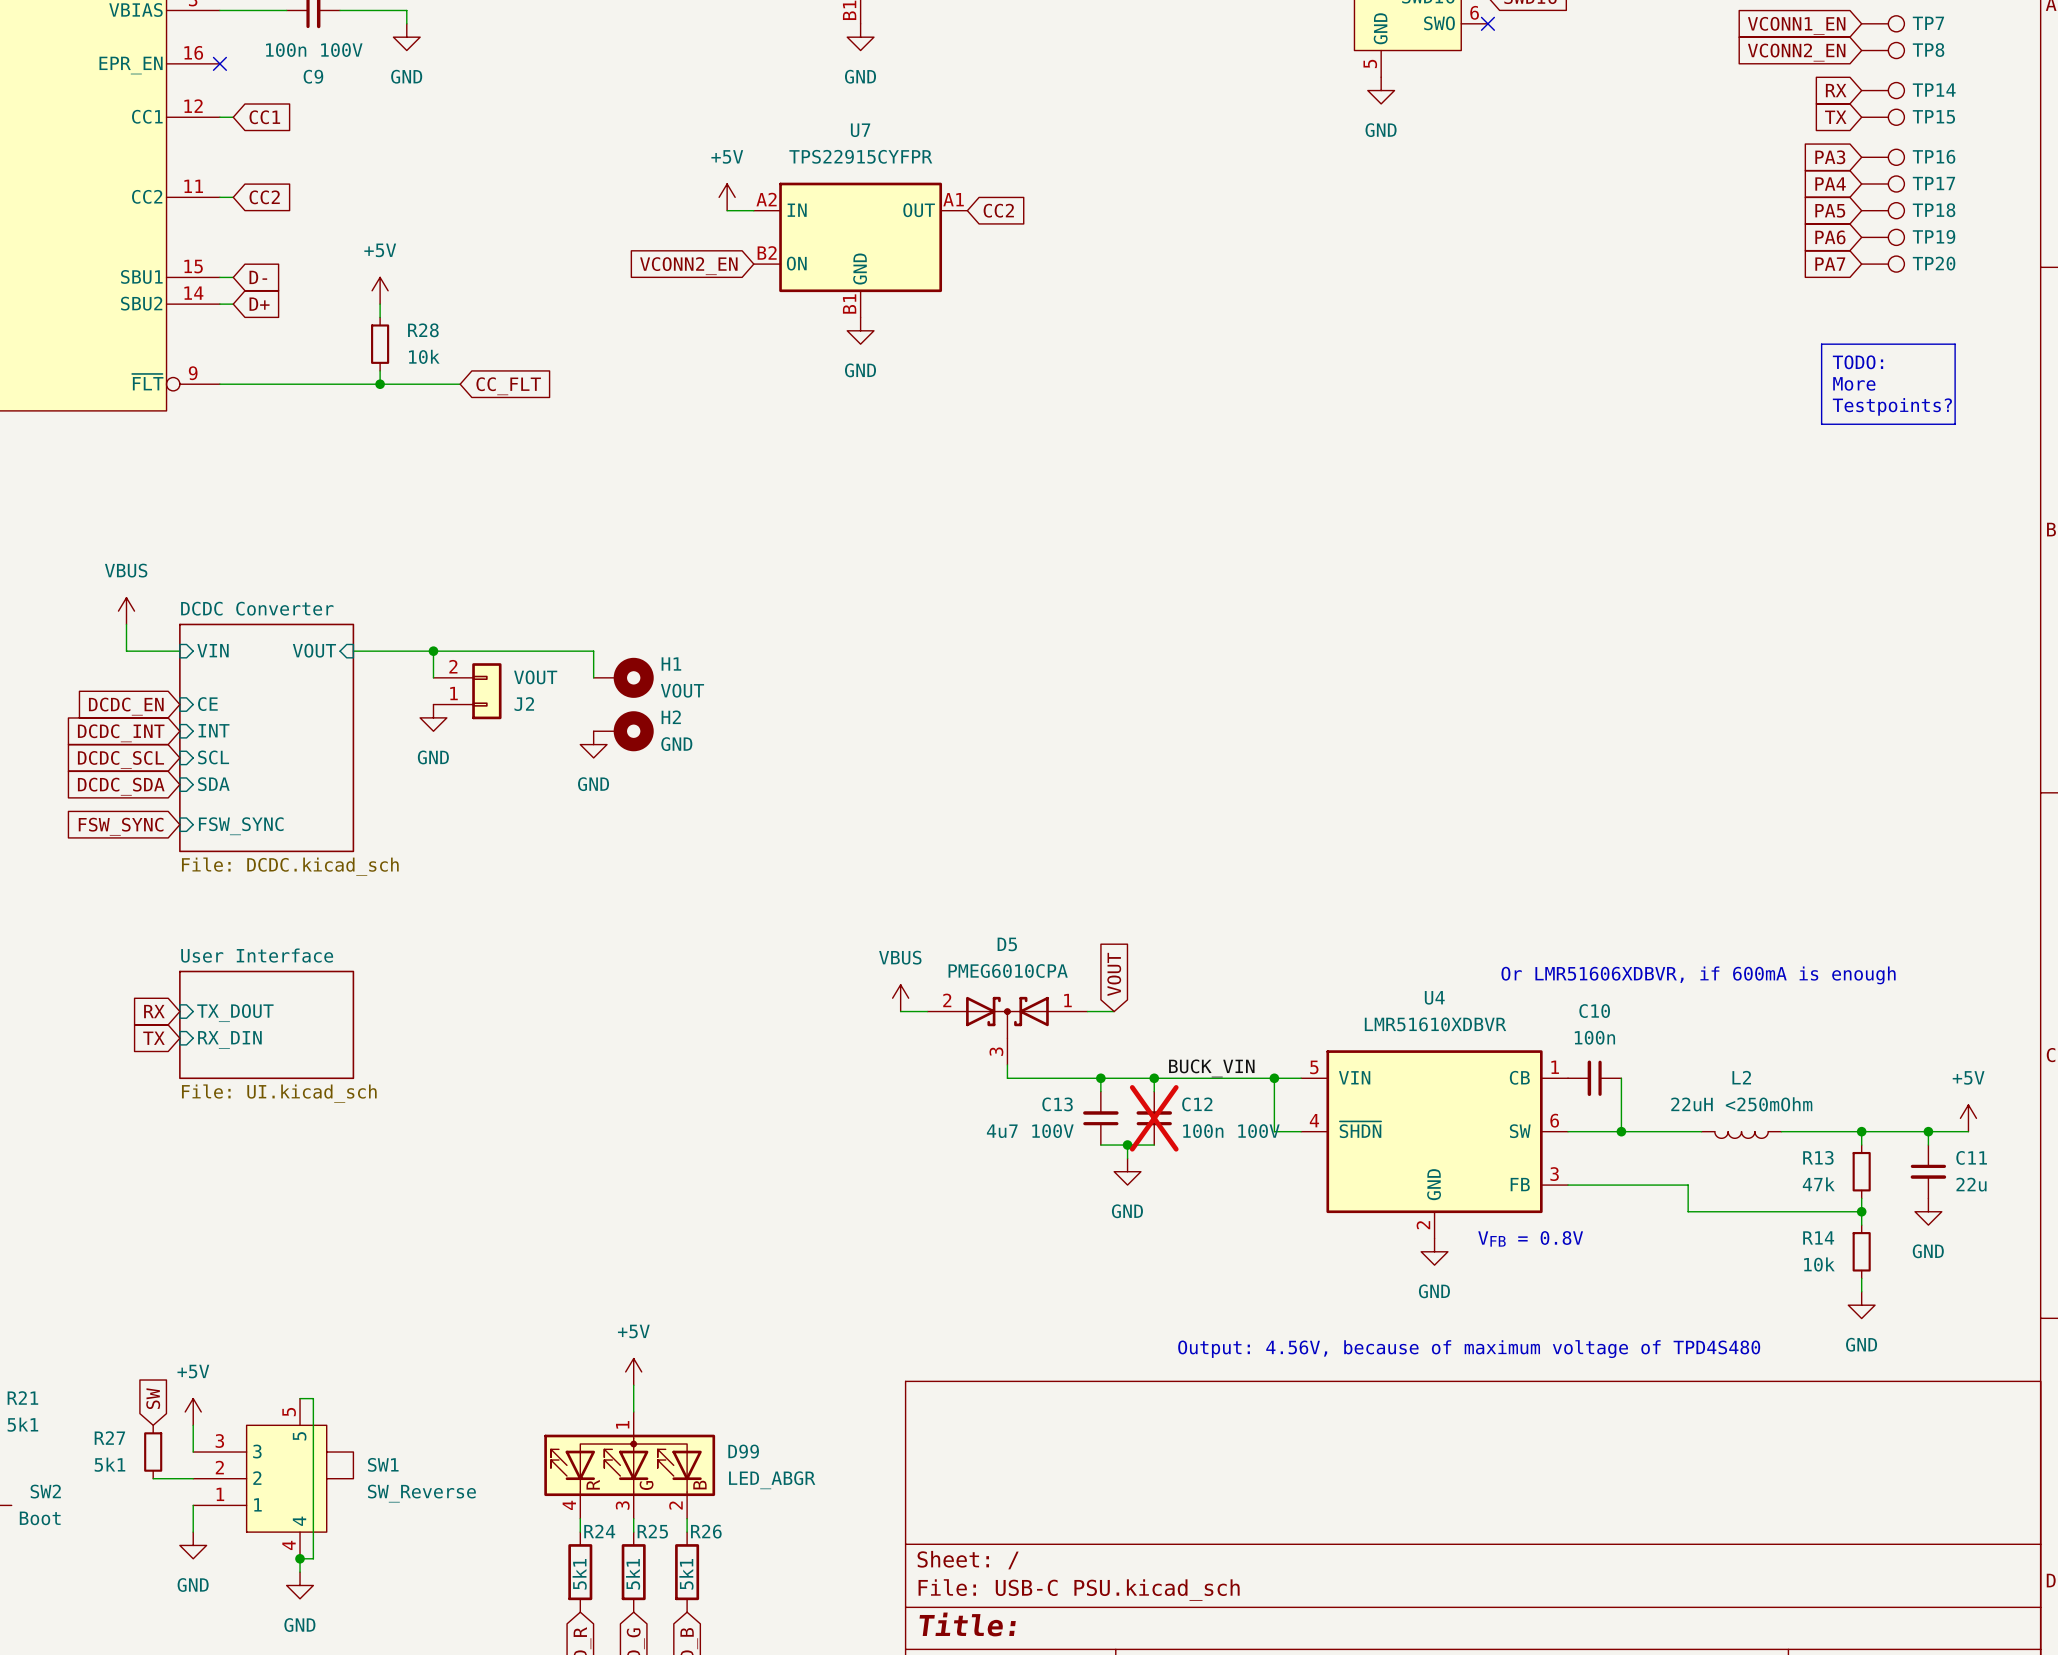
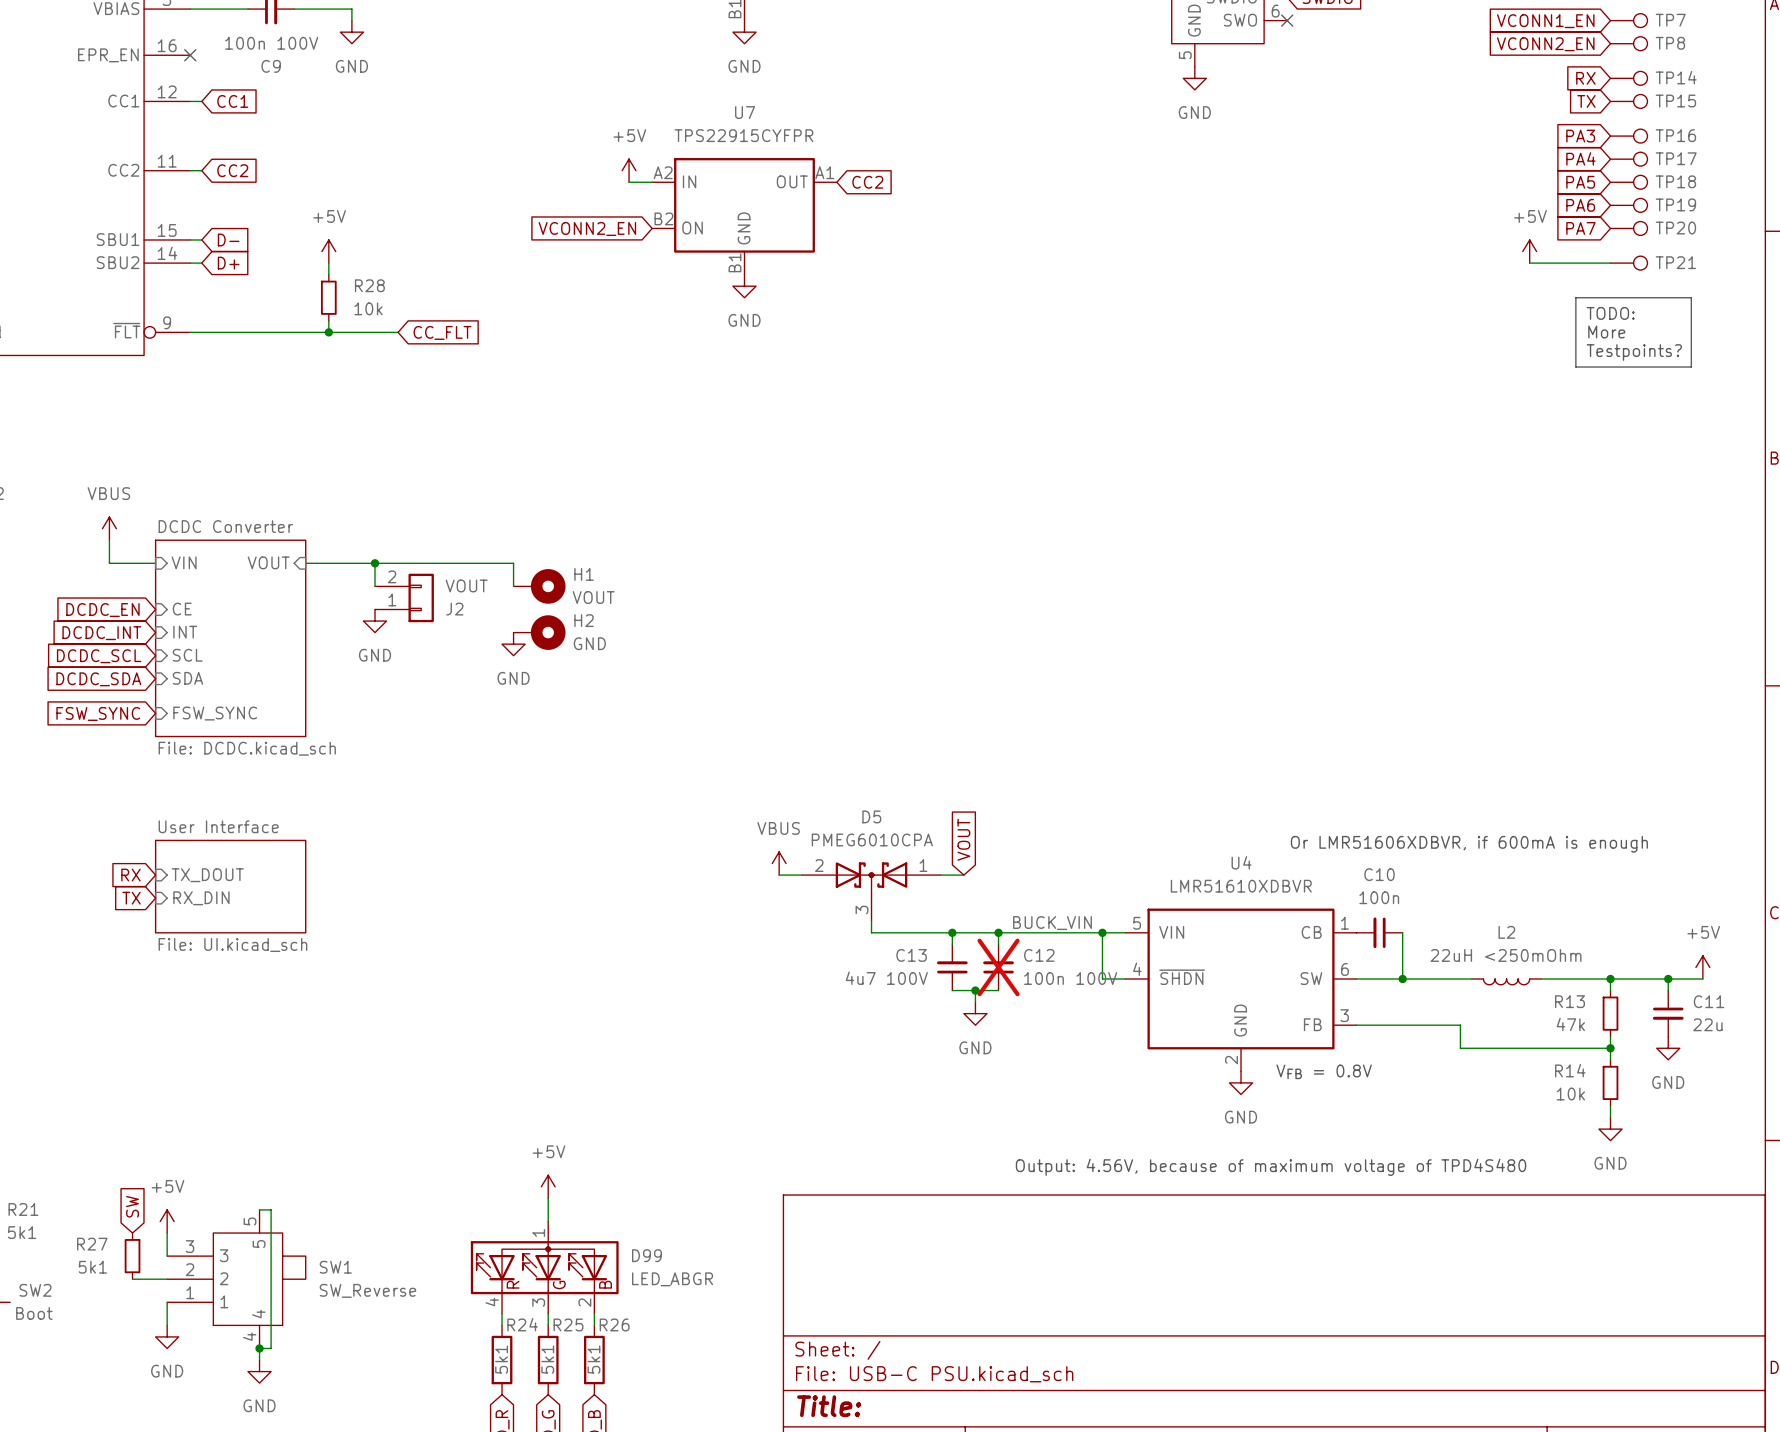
power symbol: none -> +5V (1529, 251)
wire: none -> (1529, 263) (1610, 263)
TP21: none -> (1628, 263)

